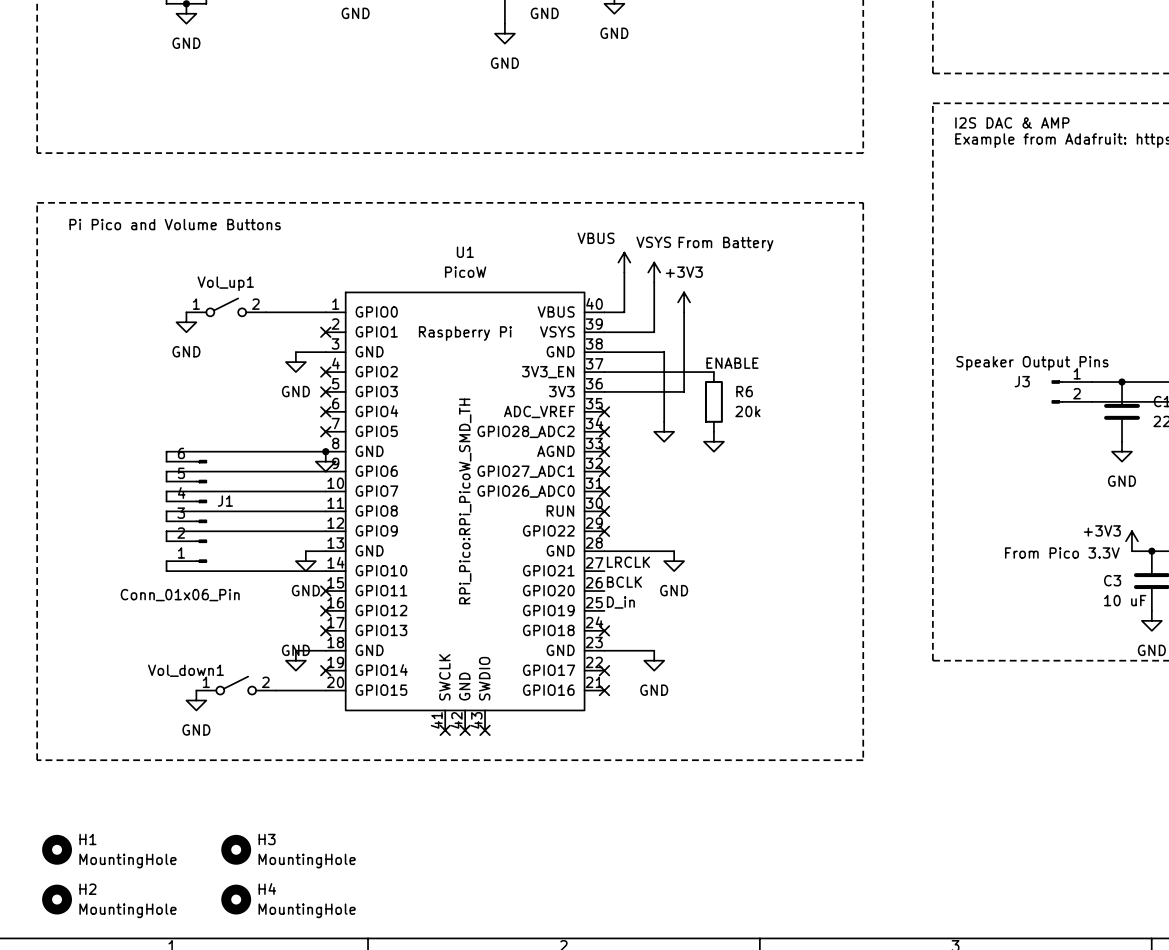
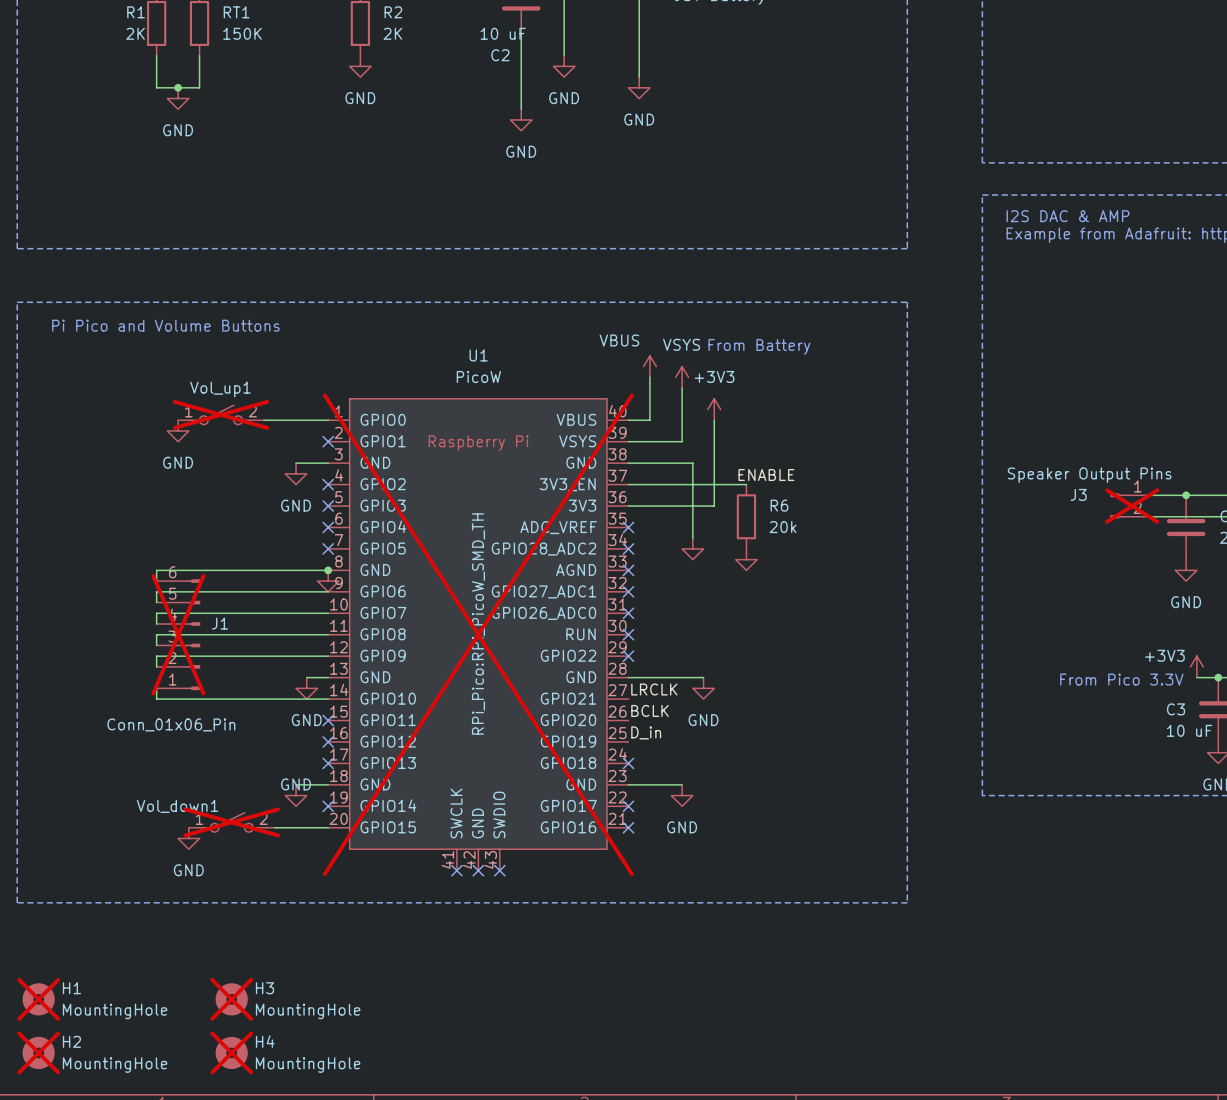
Vol_up1 do-not-place cross: none -> (220, 414)
J3 do-not-place cross: none -> (1132, 506)
J1 do-not-place cross: none -> (178, 634)
U1 do-not-place cross: none -> (478, 634)
Vol_down1 do-not-place cross: none -> (231, 822)
H1 do-not-place cross: none -> (38, 999)
H3 do-not-place cross: none -> (231, 999)
H2 do-not-place cross: none -> (38, 1052)
H4 do-not-place cross: none -> (231, 1052)

